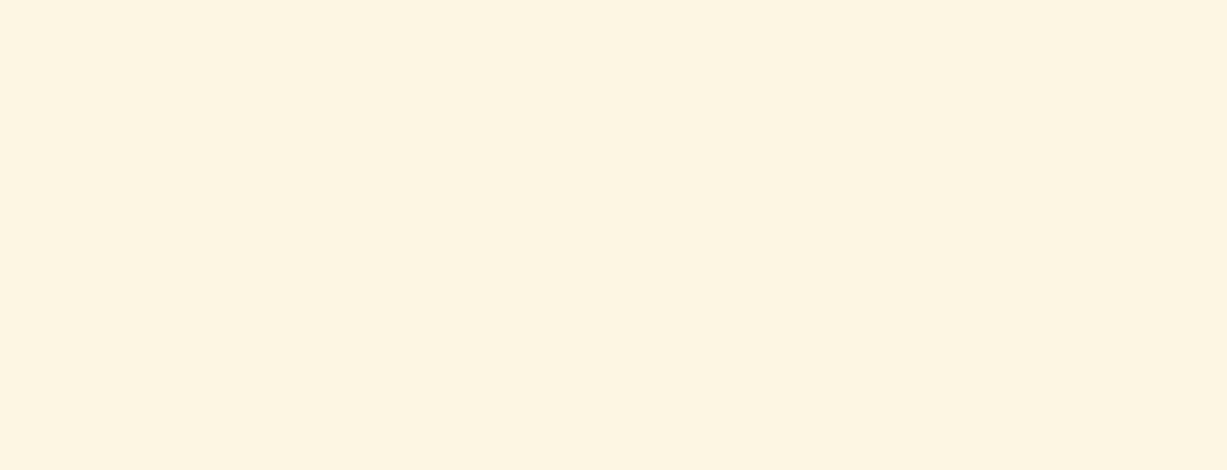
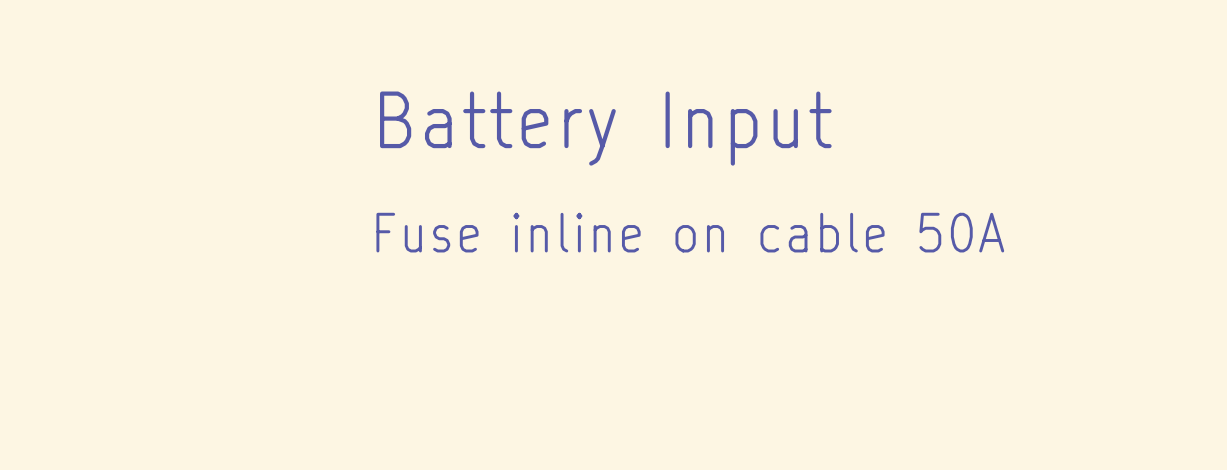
text: none -> Battery Input (605, 128)
text: none -> Fuse inline on cable 50A (690, 232)

